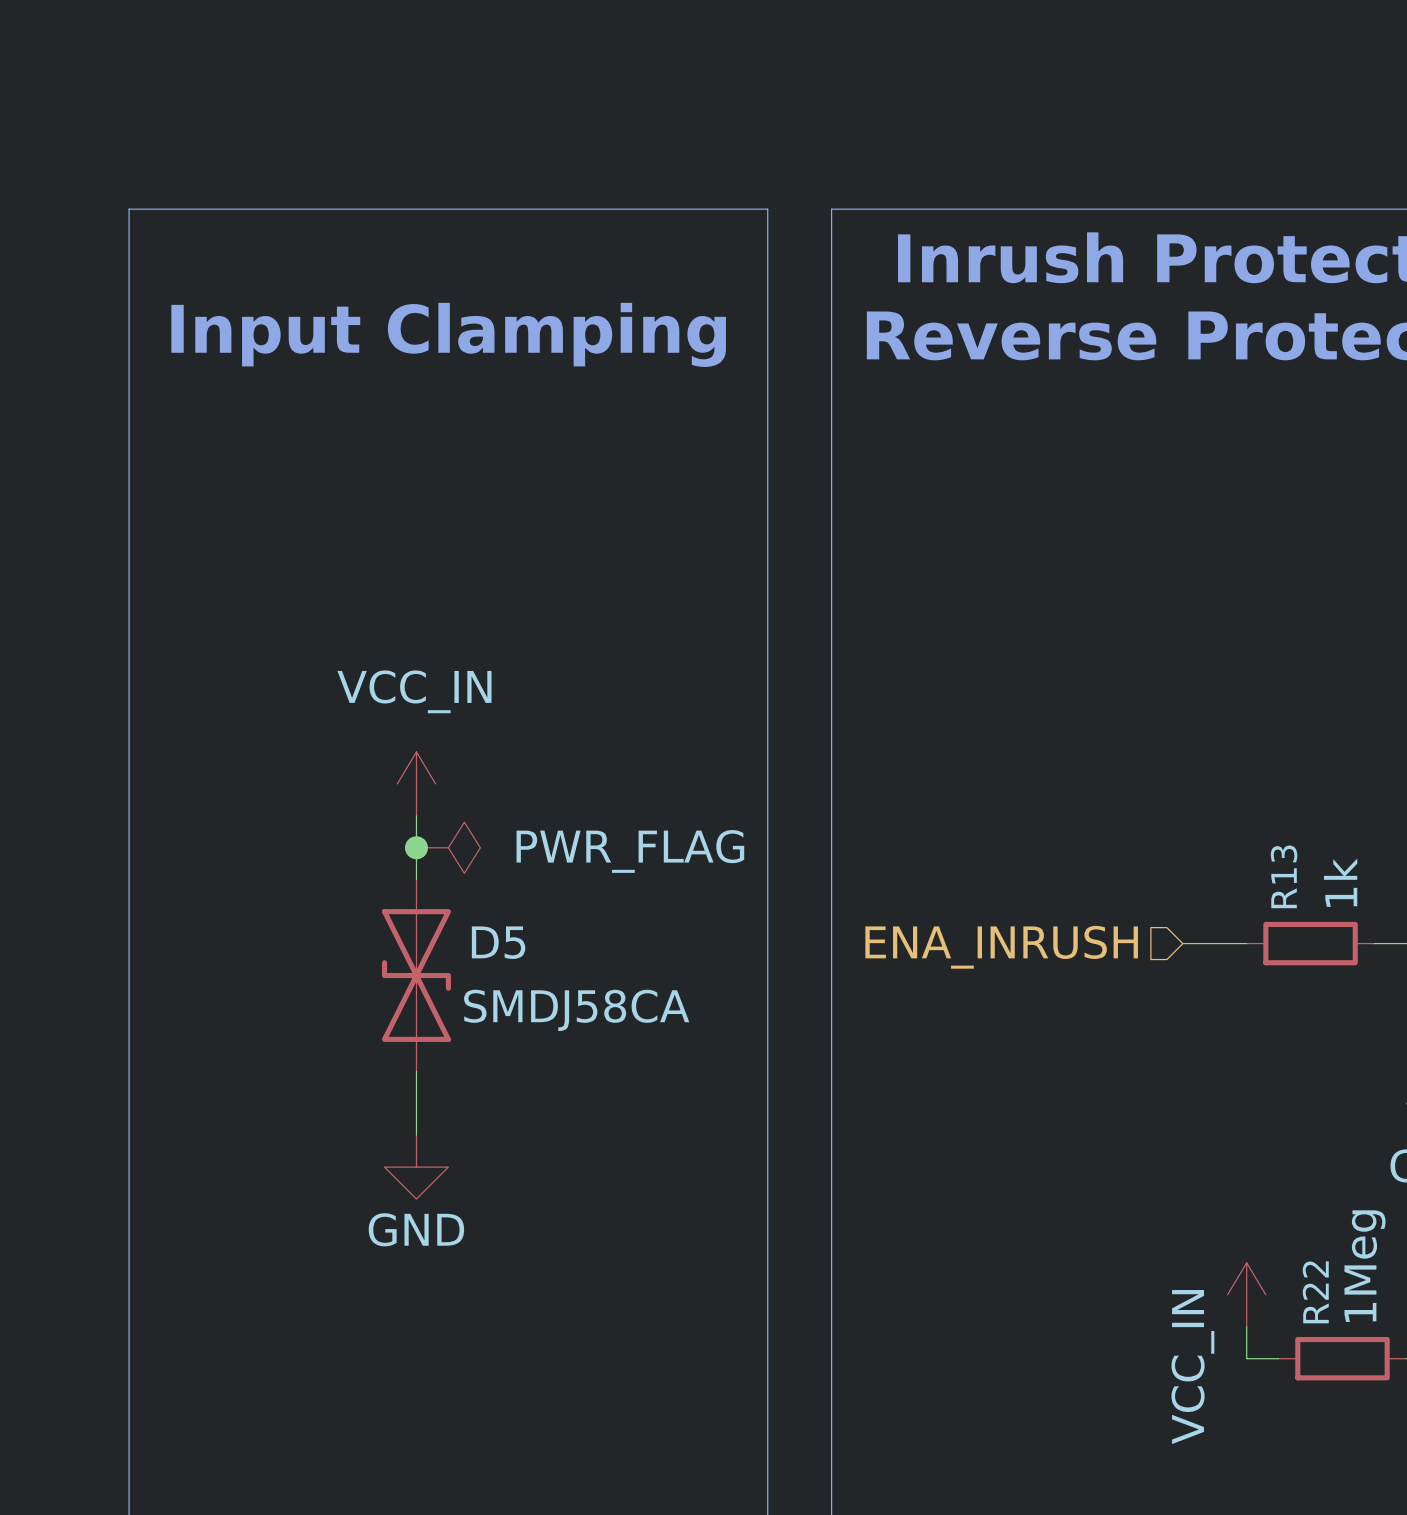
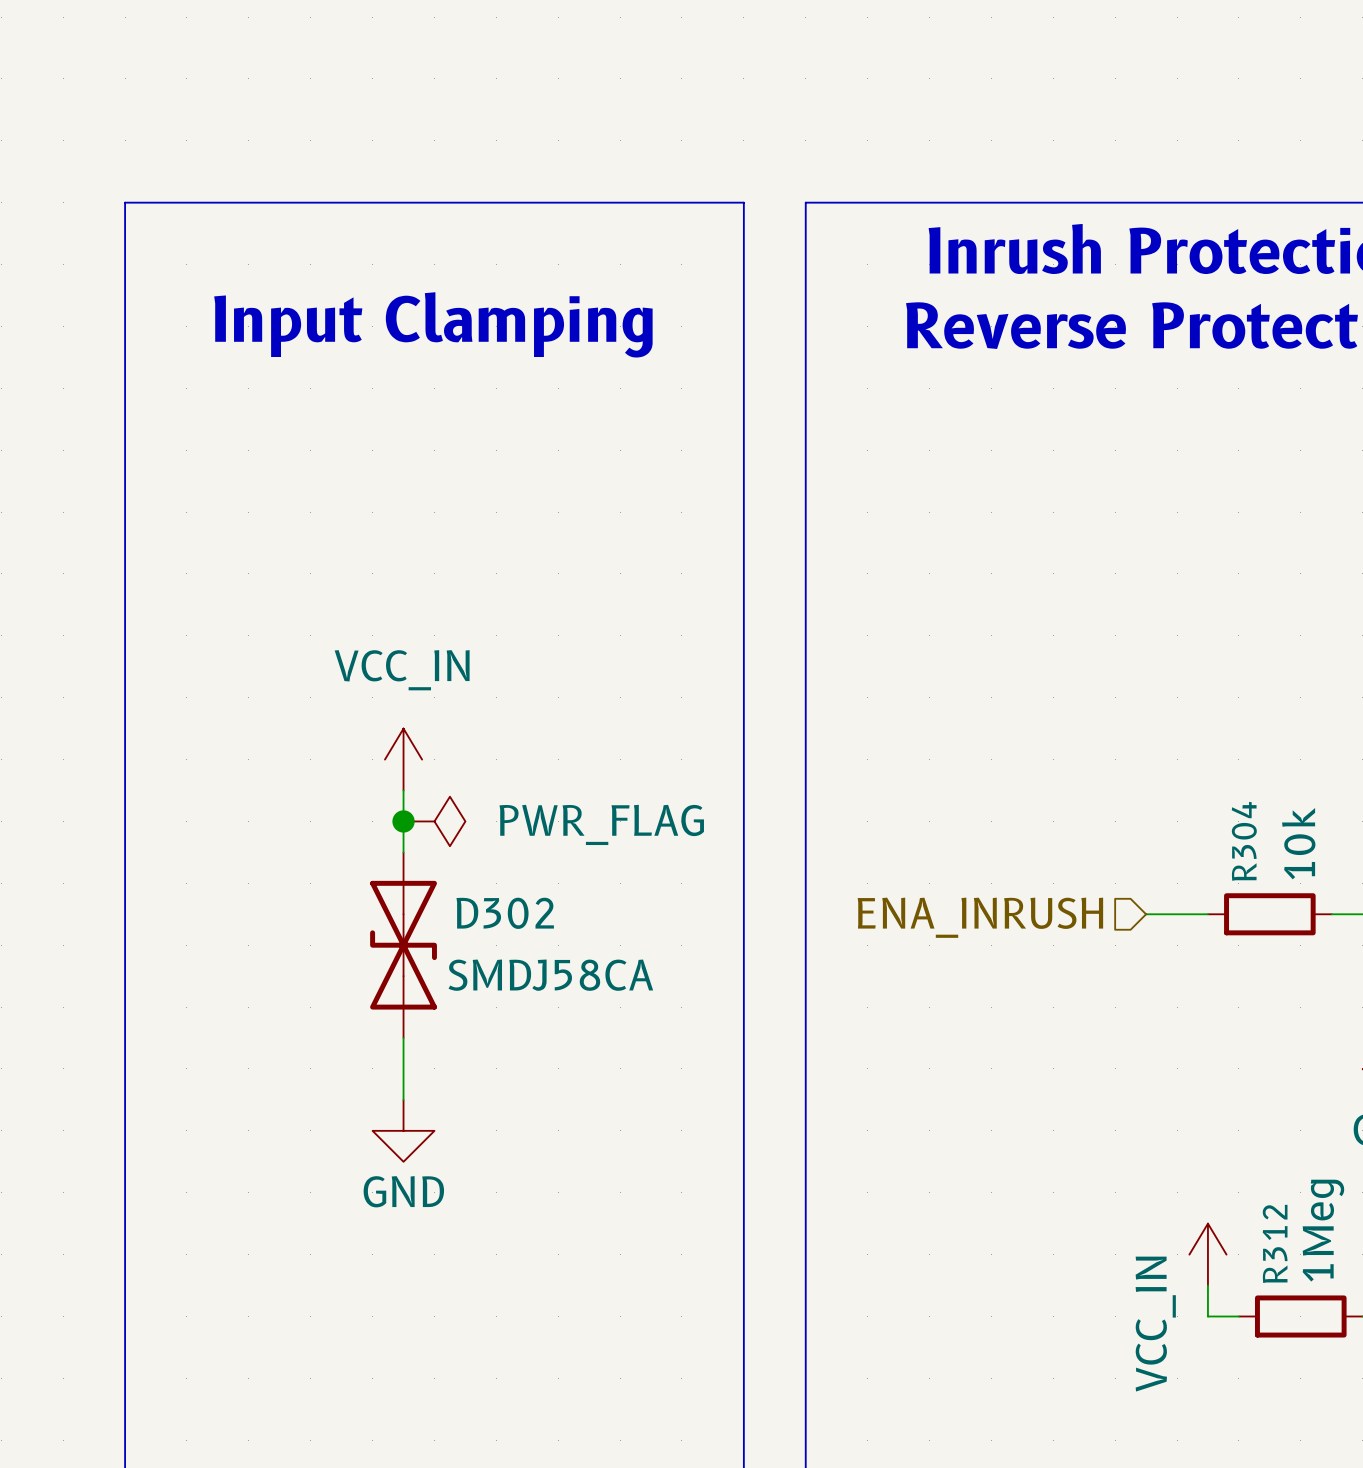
R13 name: R13 (1284, 876) -> R304 (1244, 841)
R13 value: 1k (1340, 882) -> 10k (1298, 843)
D5 name: D5 (498, 942) -> D302 (505, 913)
R22 name: R22 (1315, 1292) -> R312 (1275, 1243)

